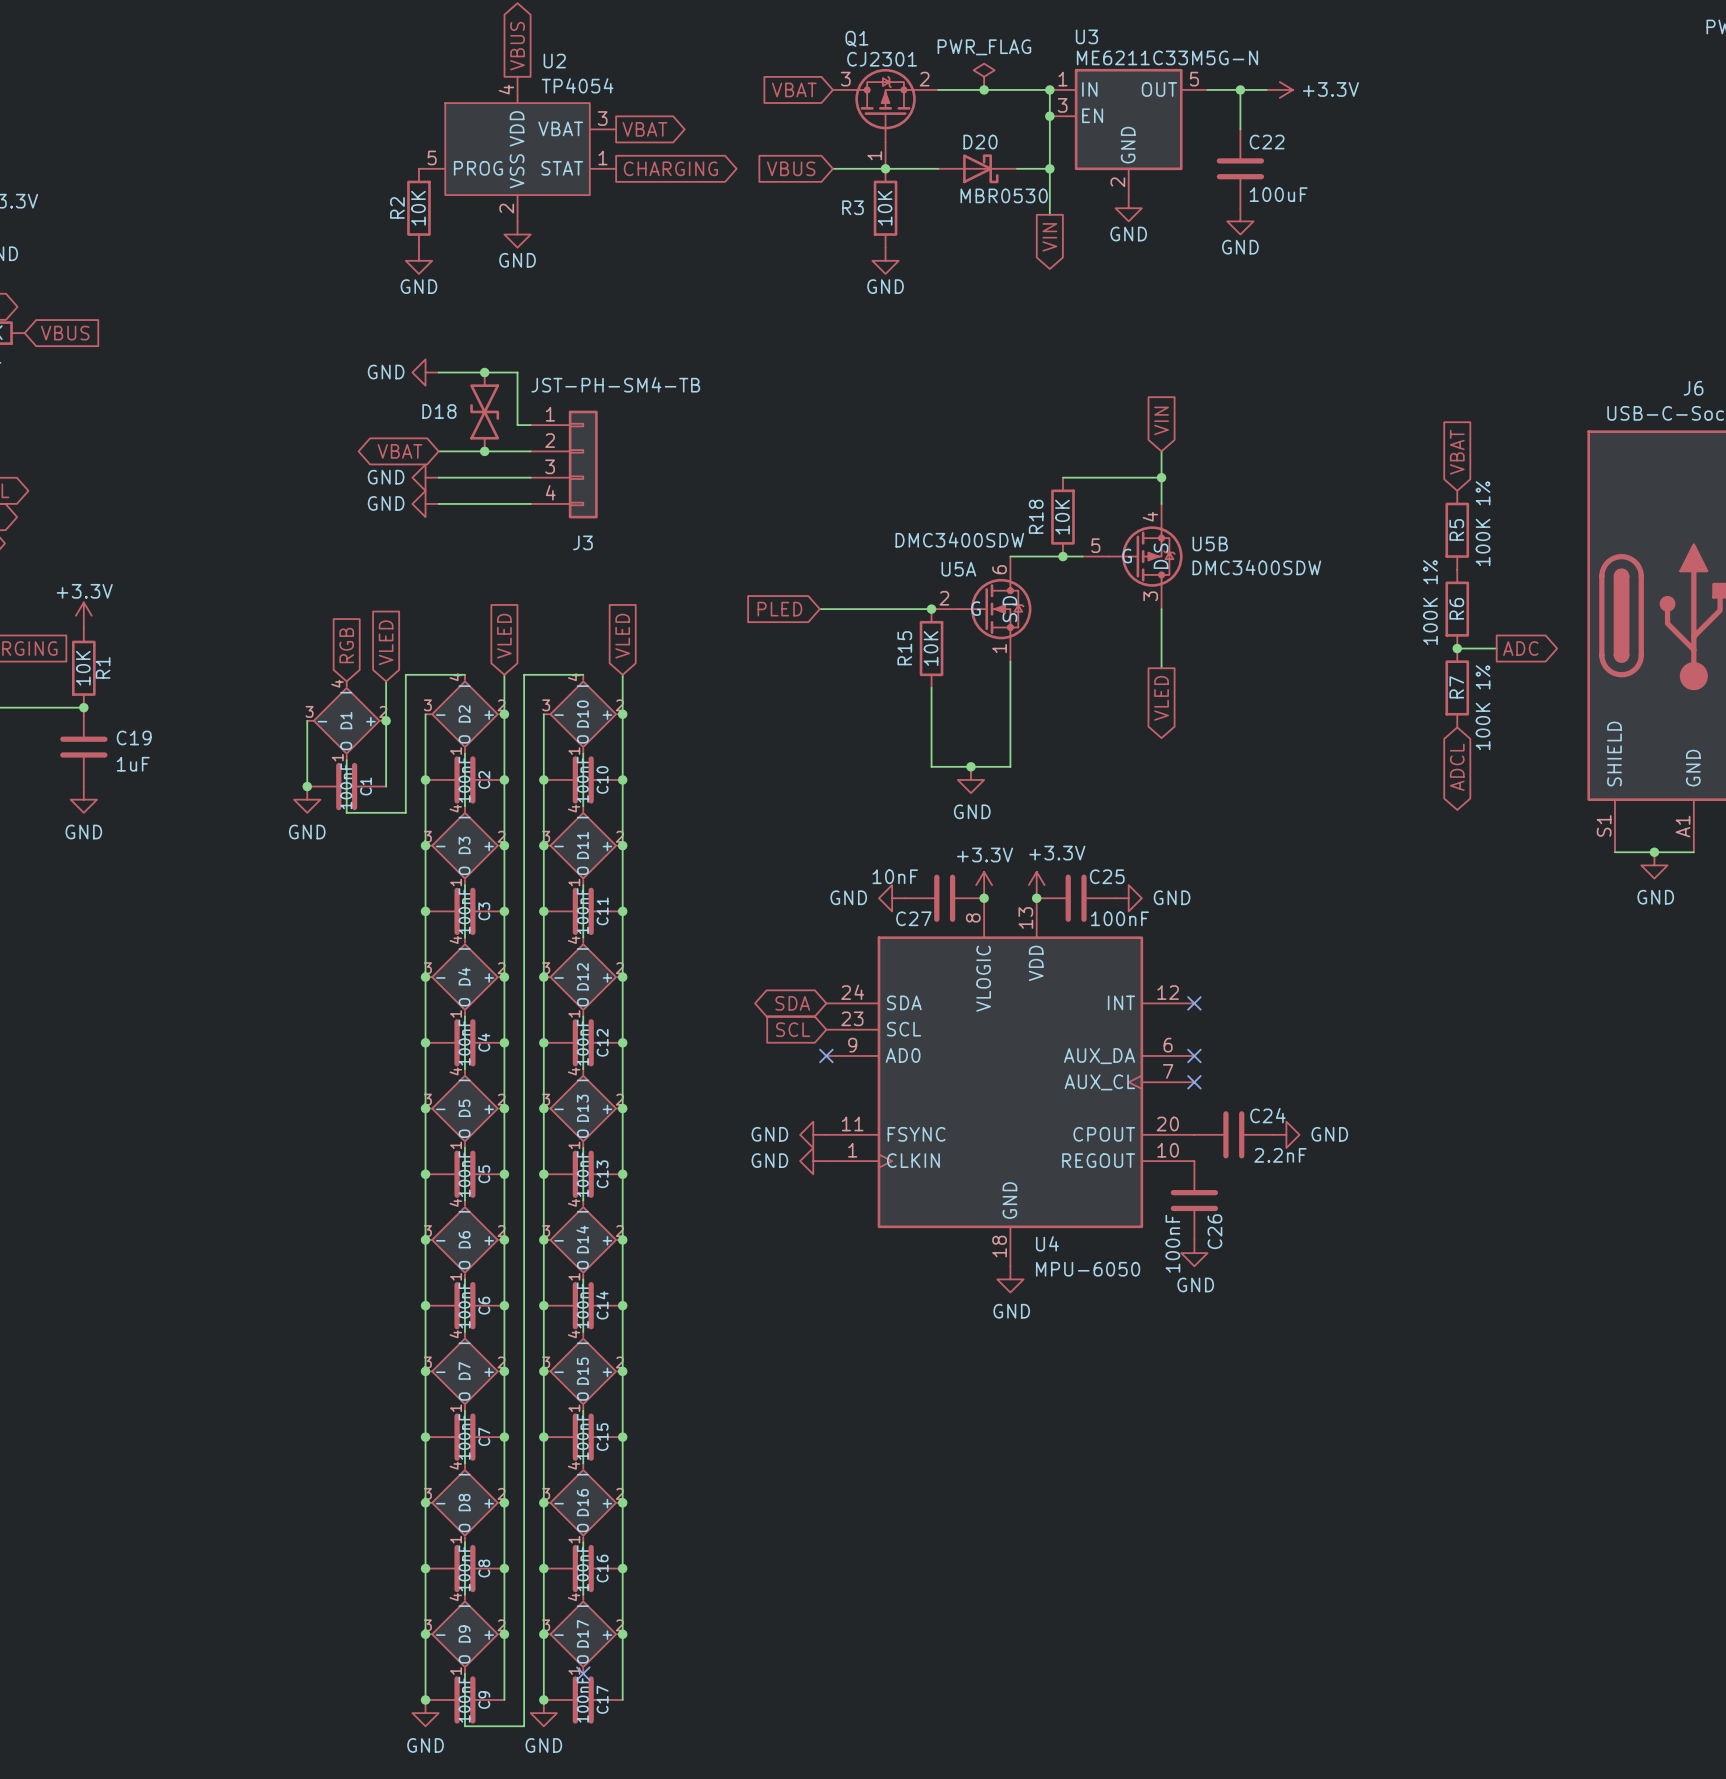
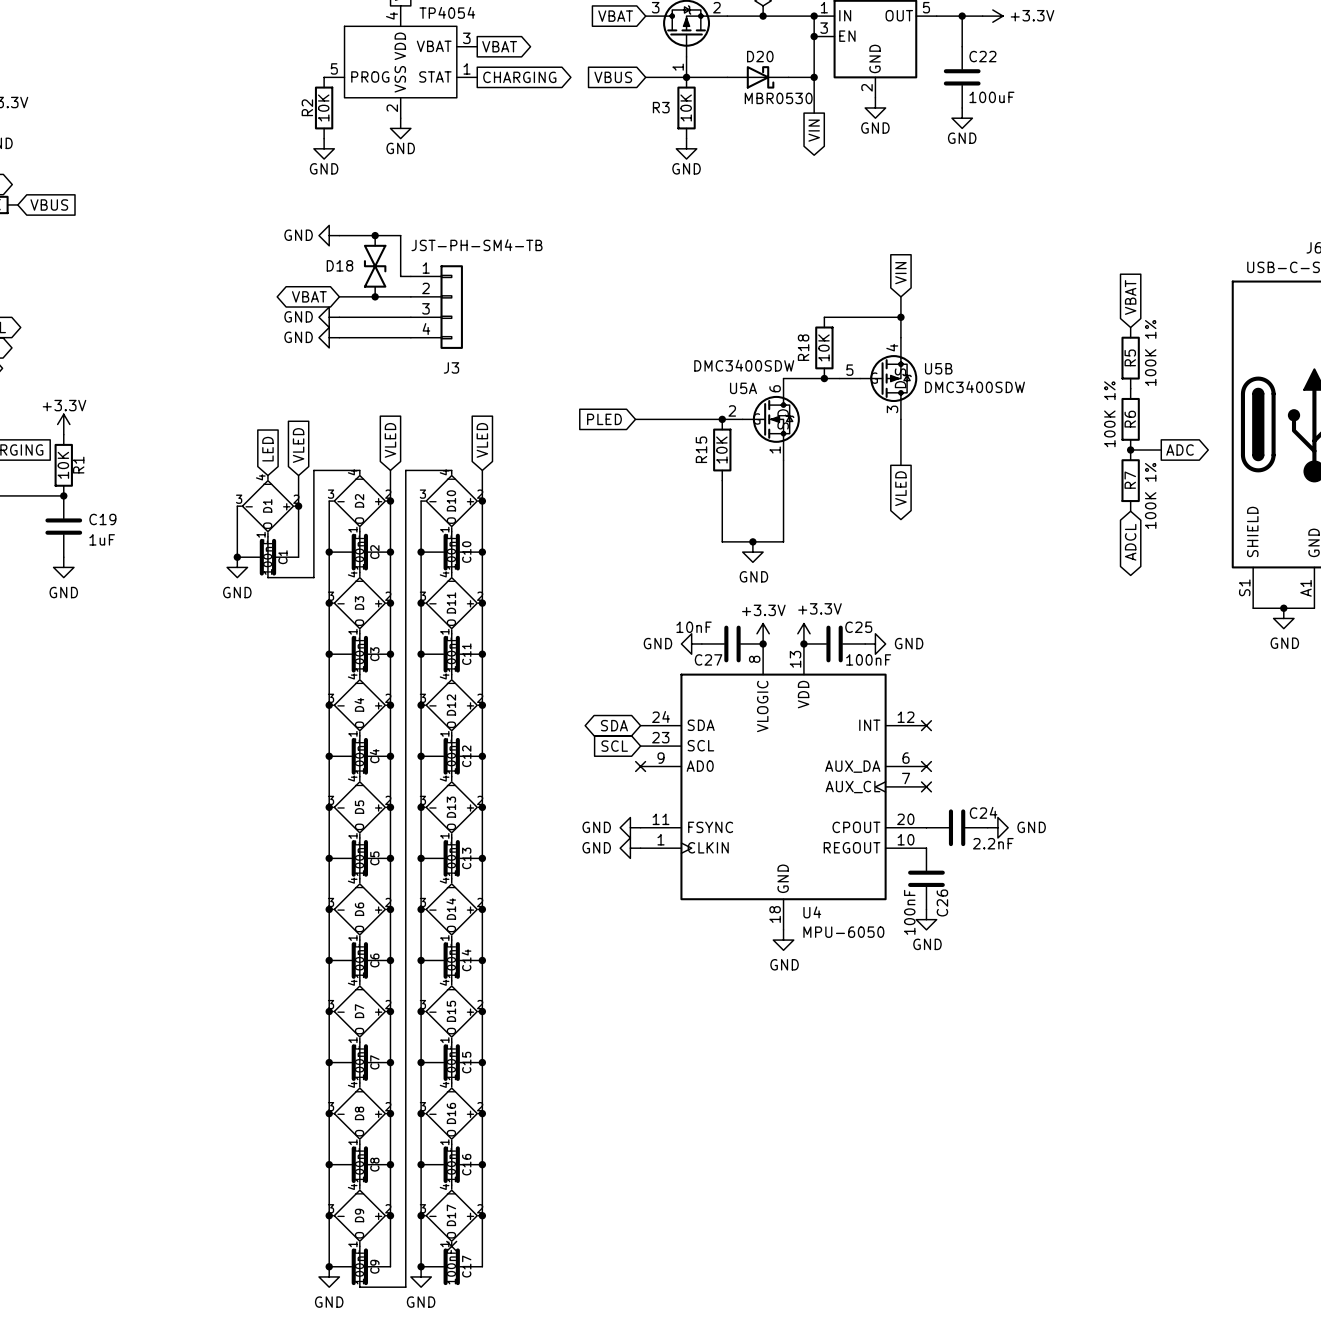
global label: RGB (346, 645) -> LED (267, 449)

